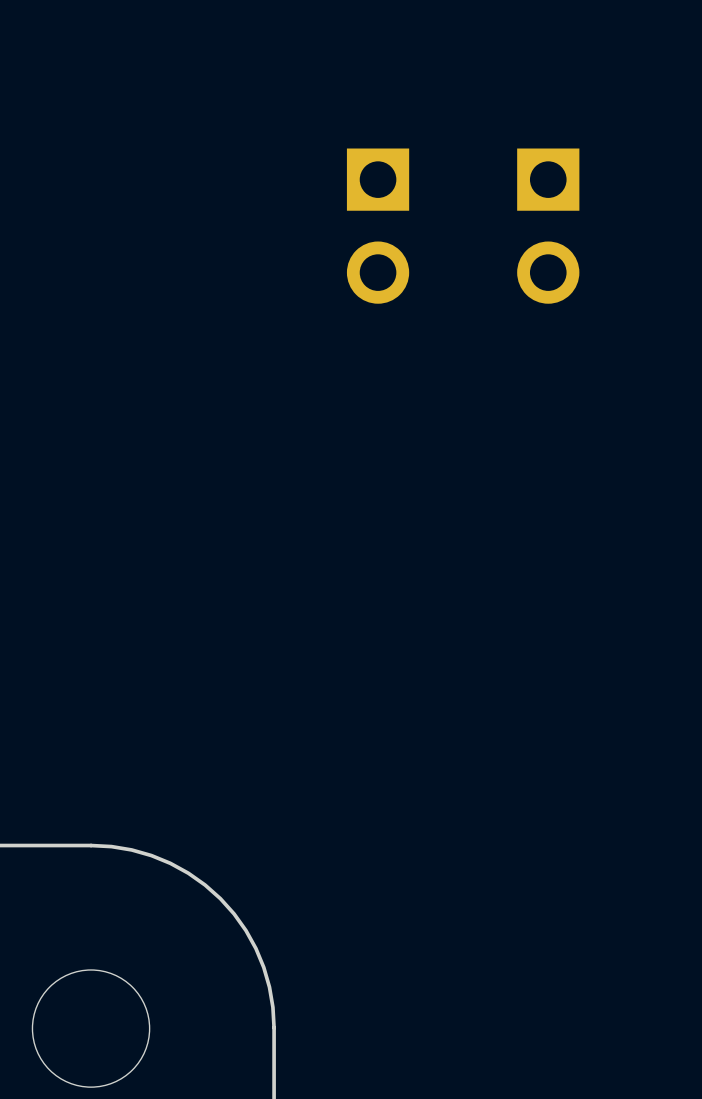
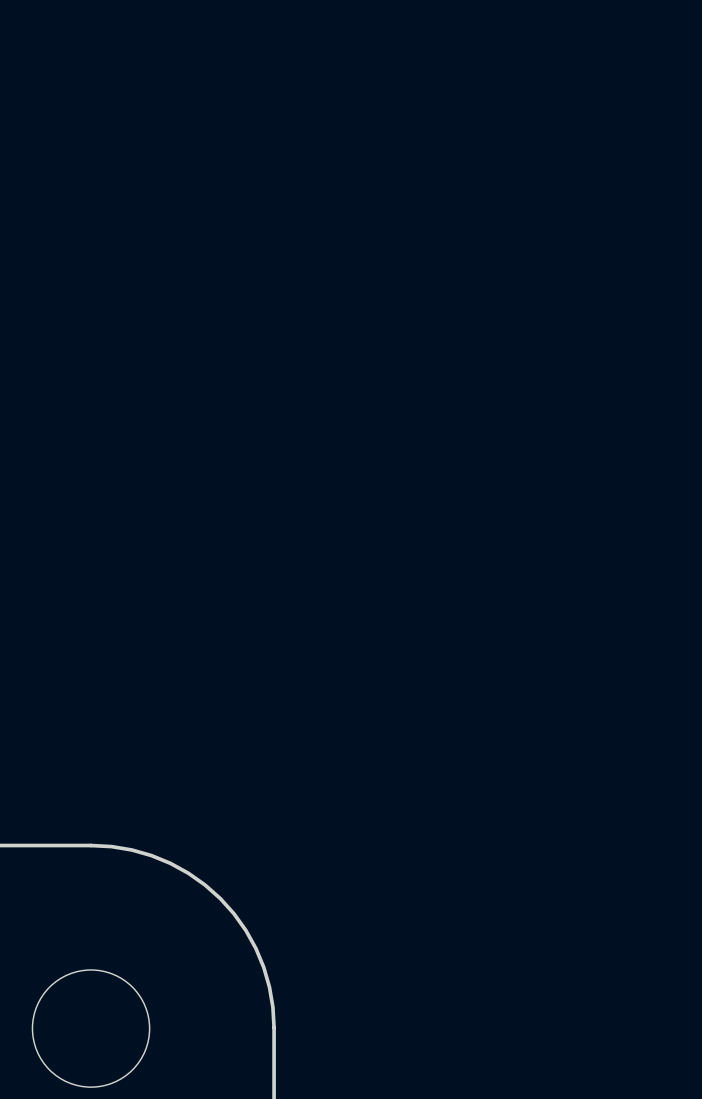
part: (378, 226) -> none
part: (548, 226) -> none

